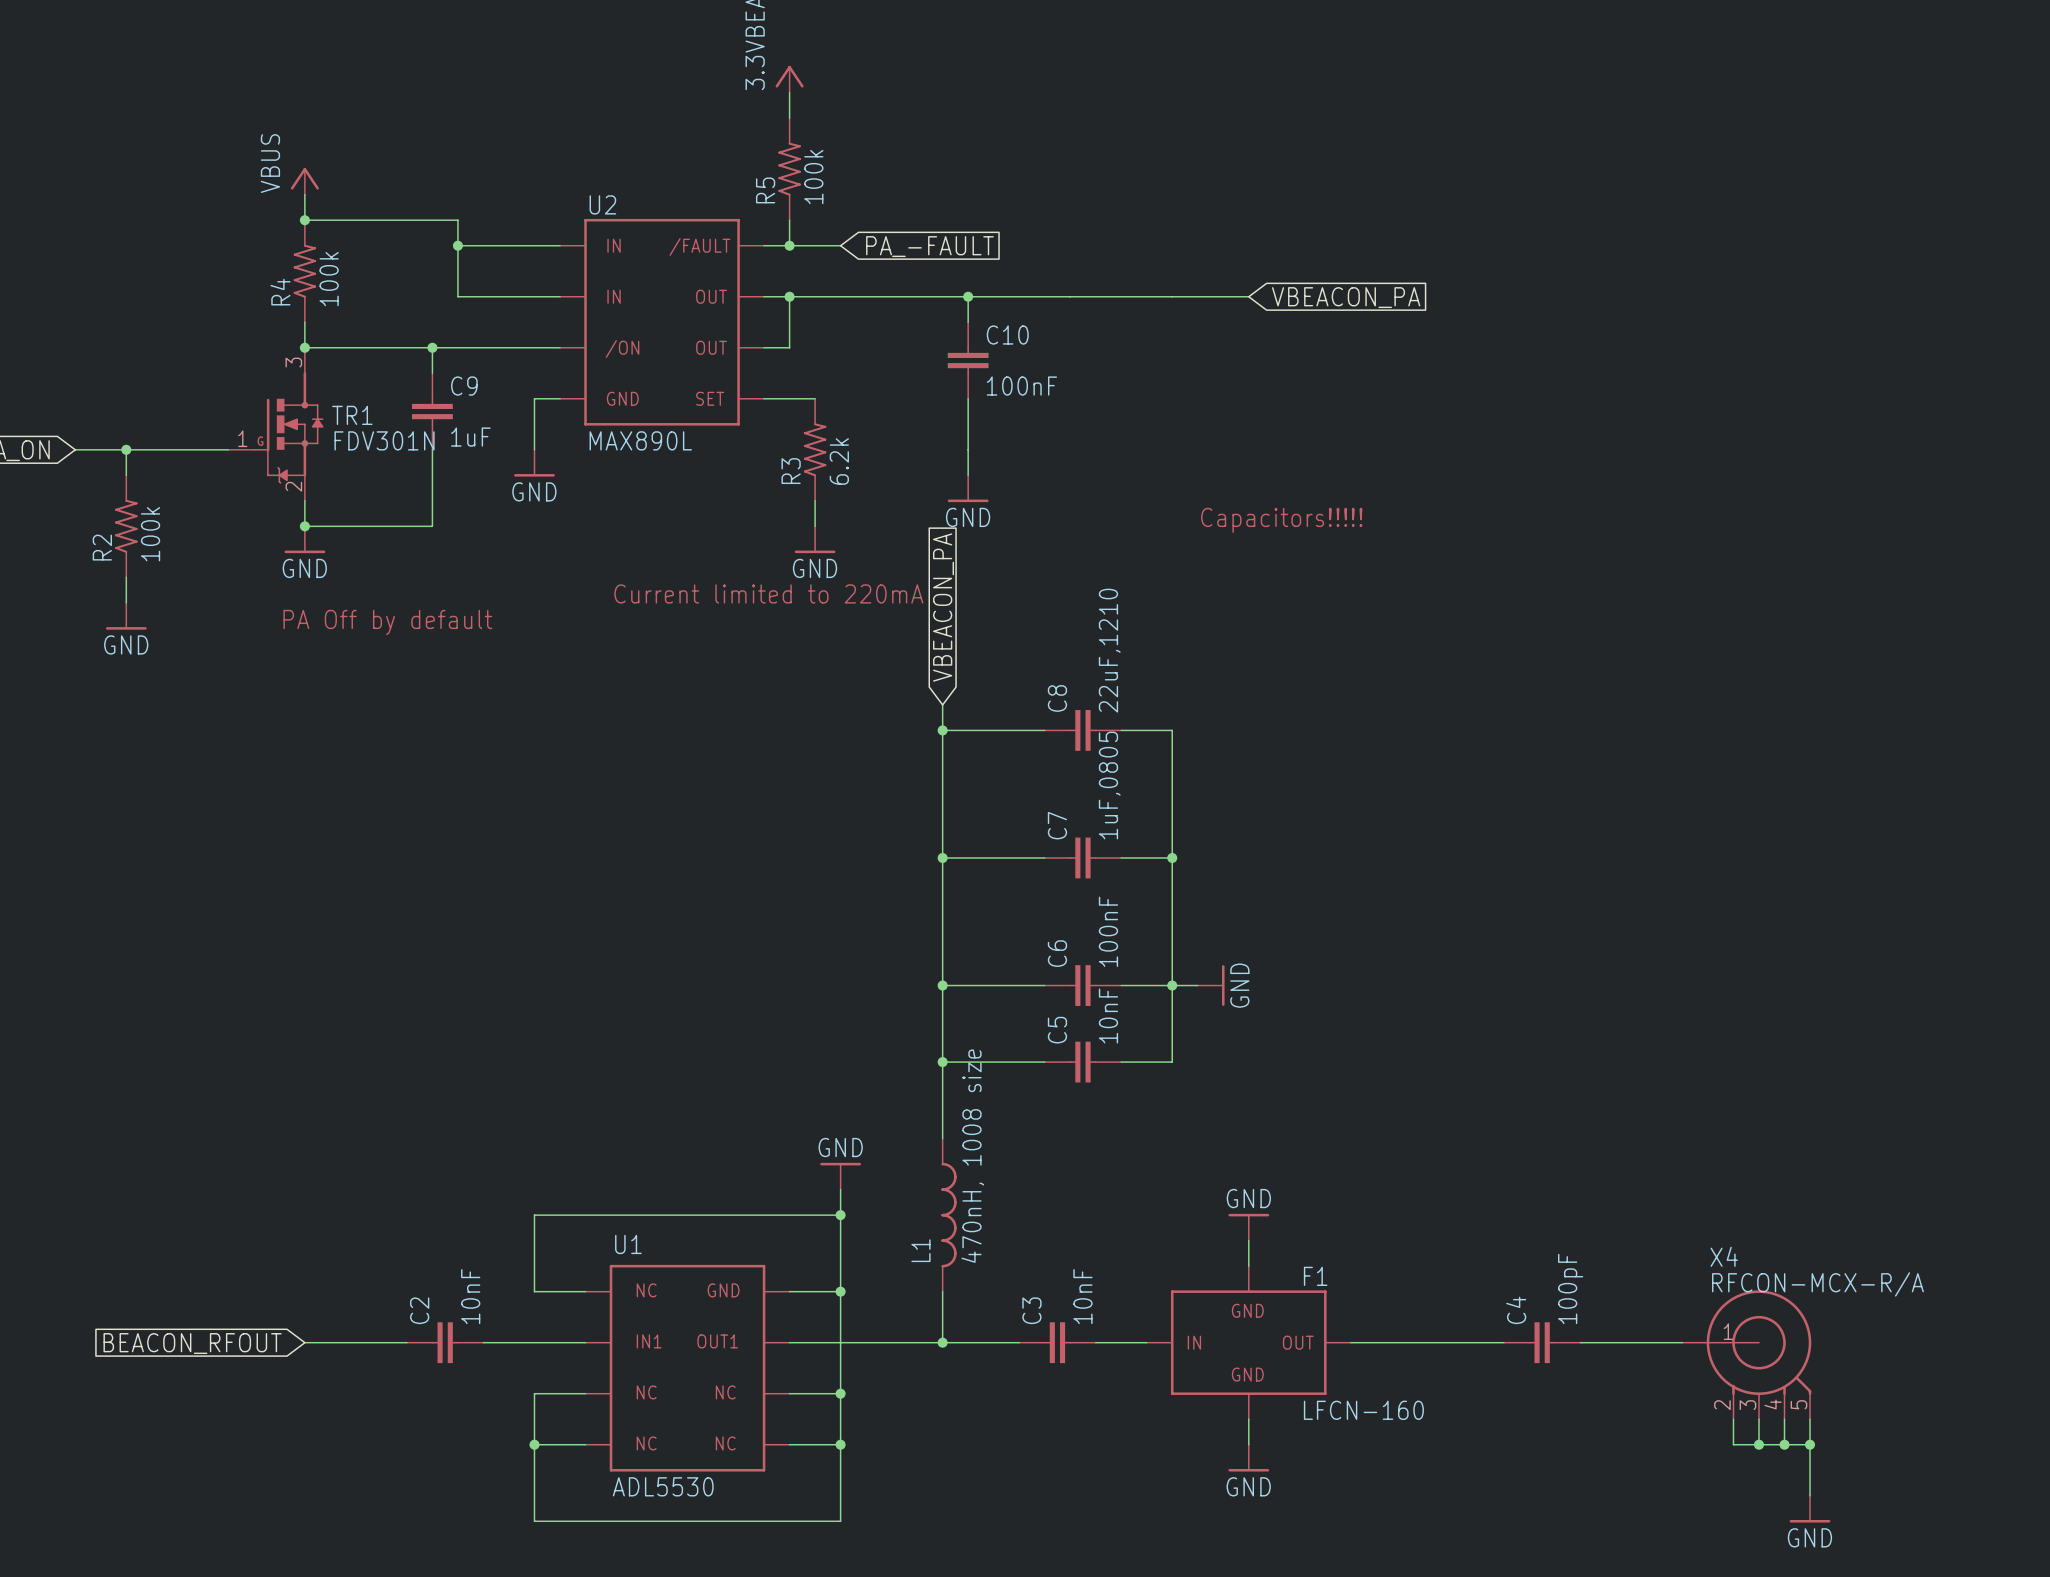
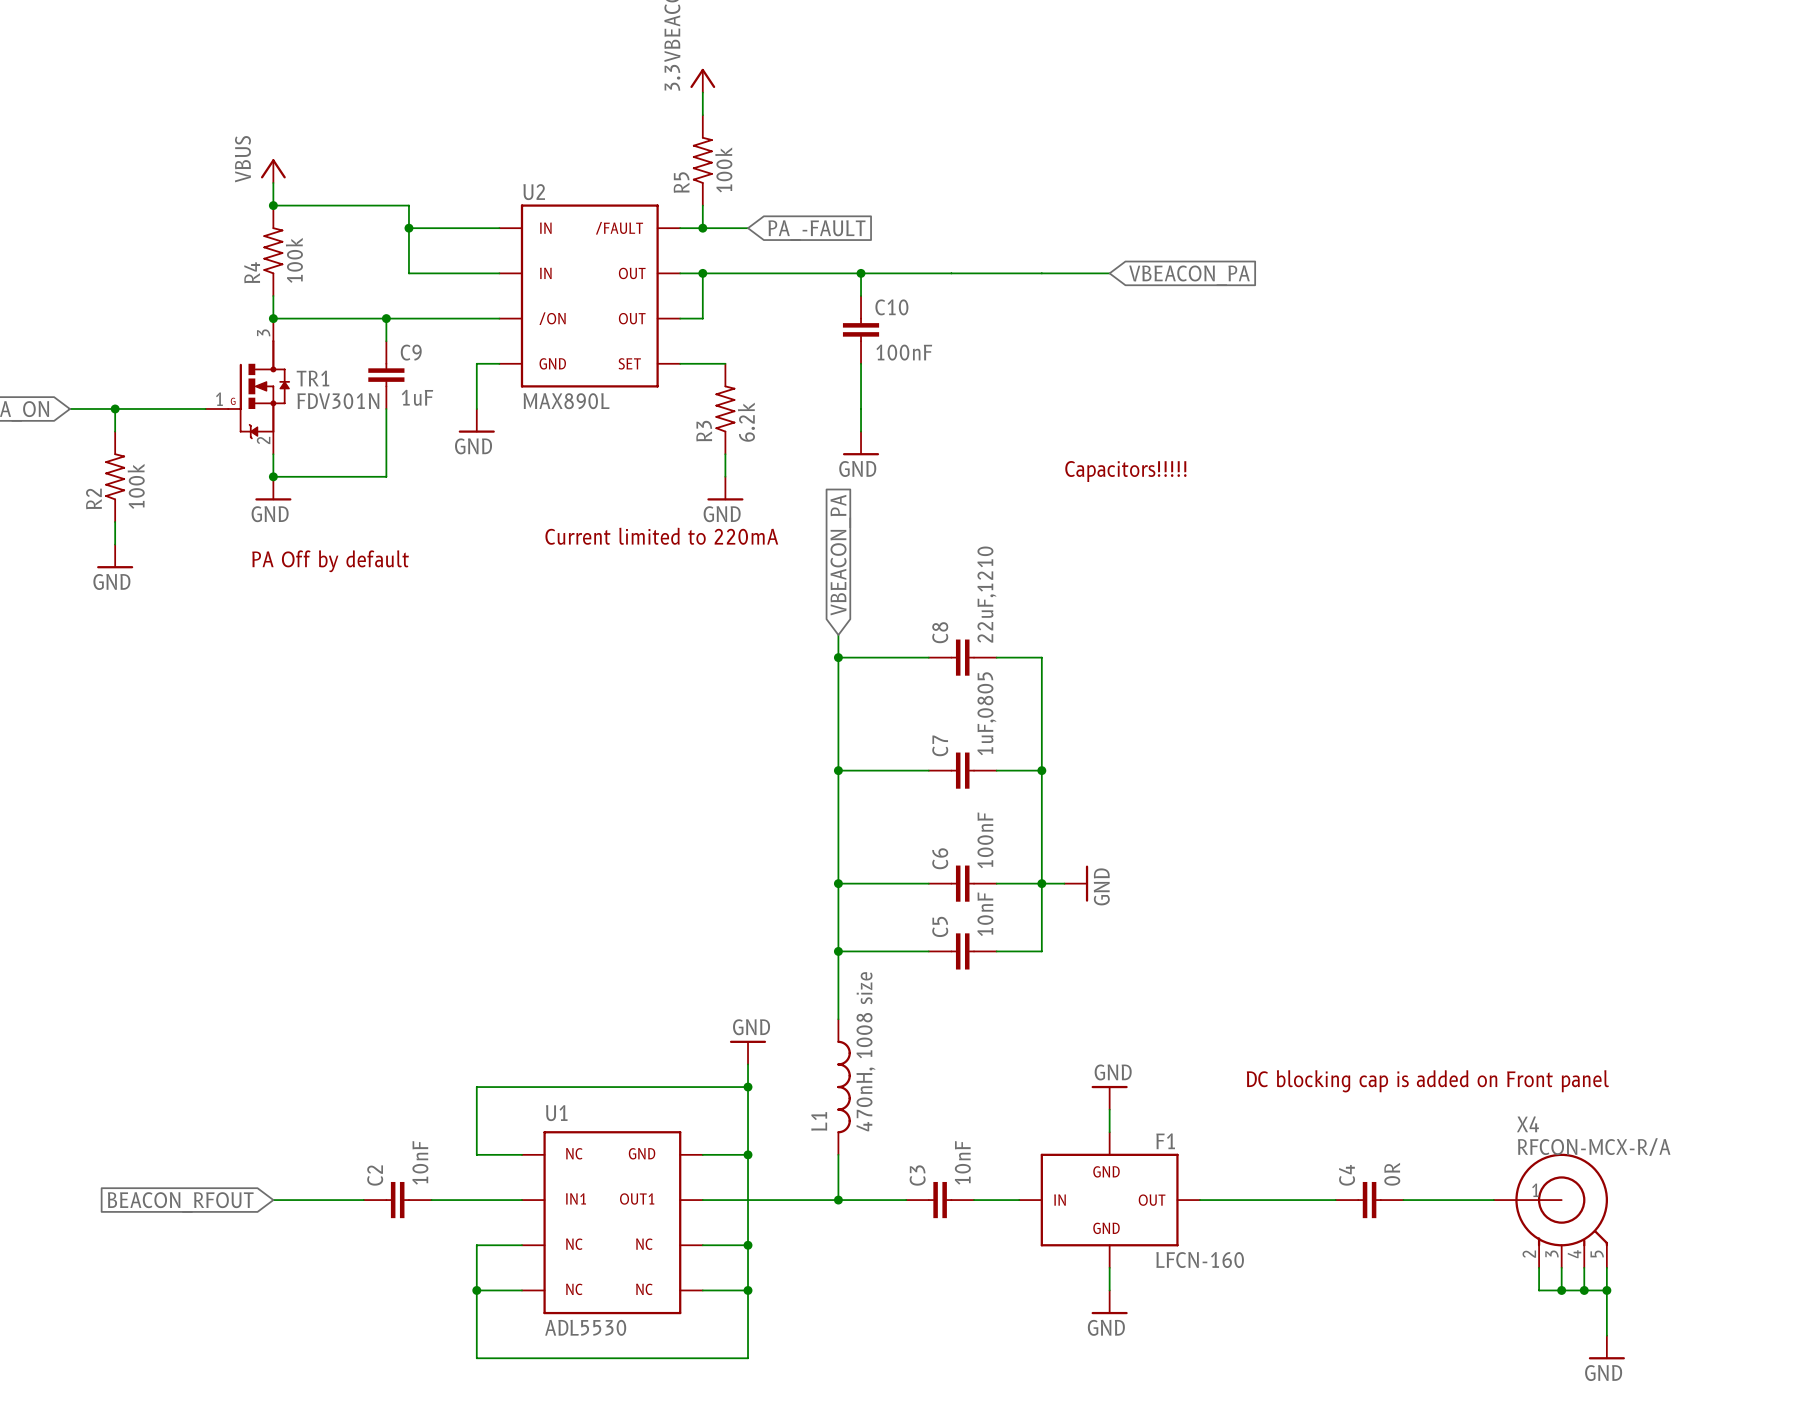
text: none -> DC blocking cap is added on Front panel (1427, 1081)
C4 value: 100pF (1570, 1288) -> 0R (1392, 1174)

